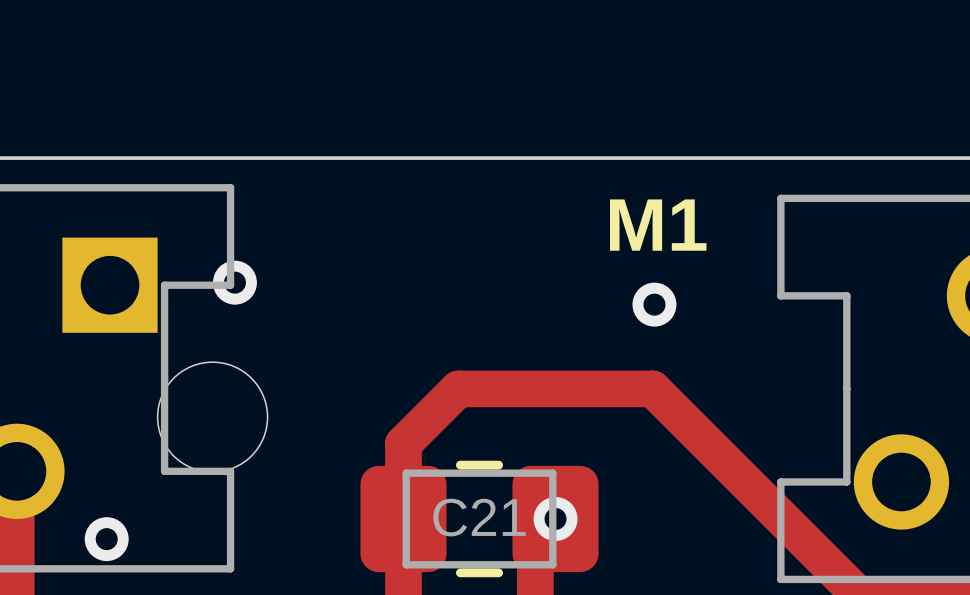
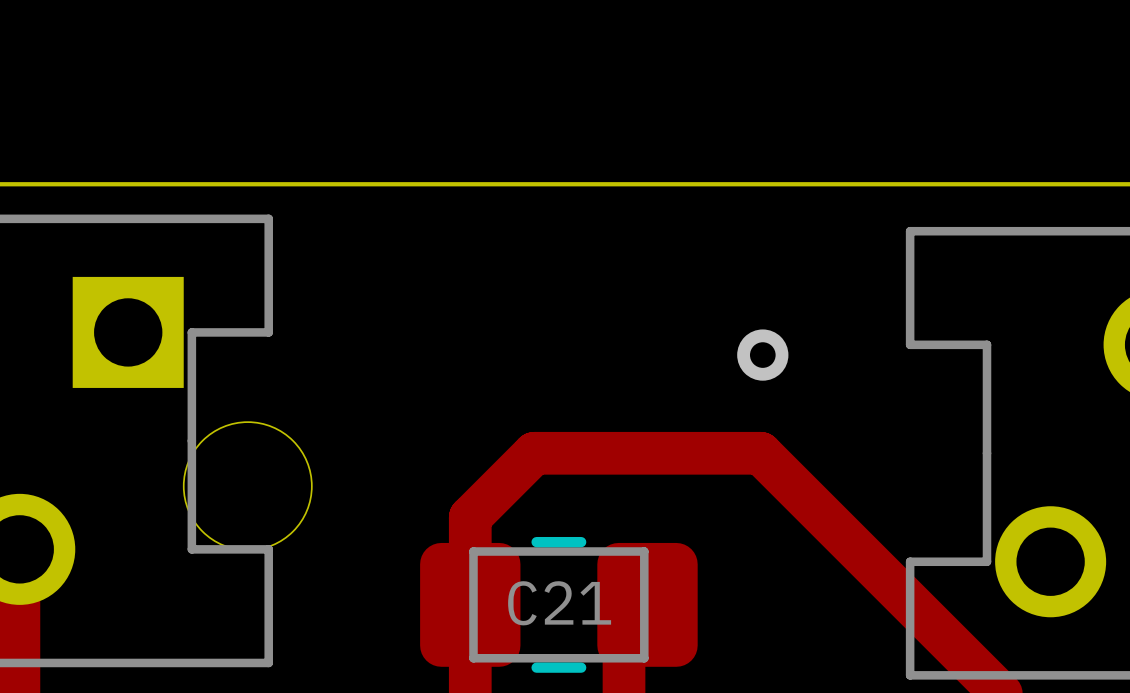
text: M1 (658, 225) -> none
via: (234, 282) -> none
via: (555, 518) -> none
via: (106, 539) -> none

